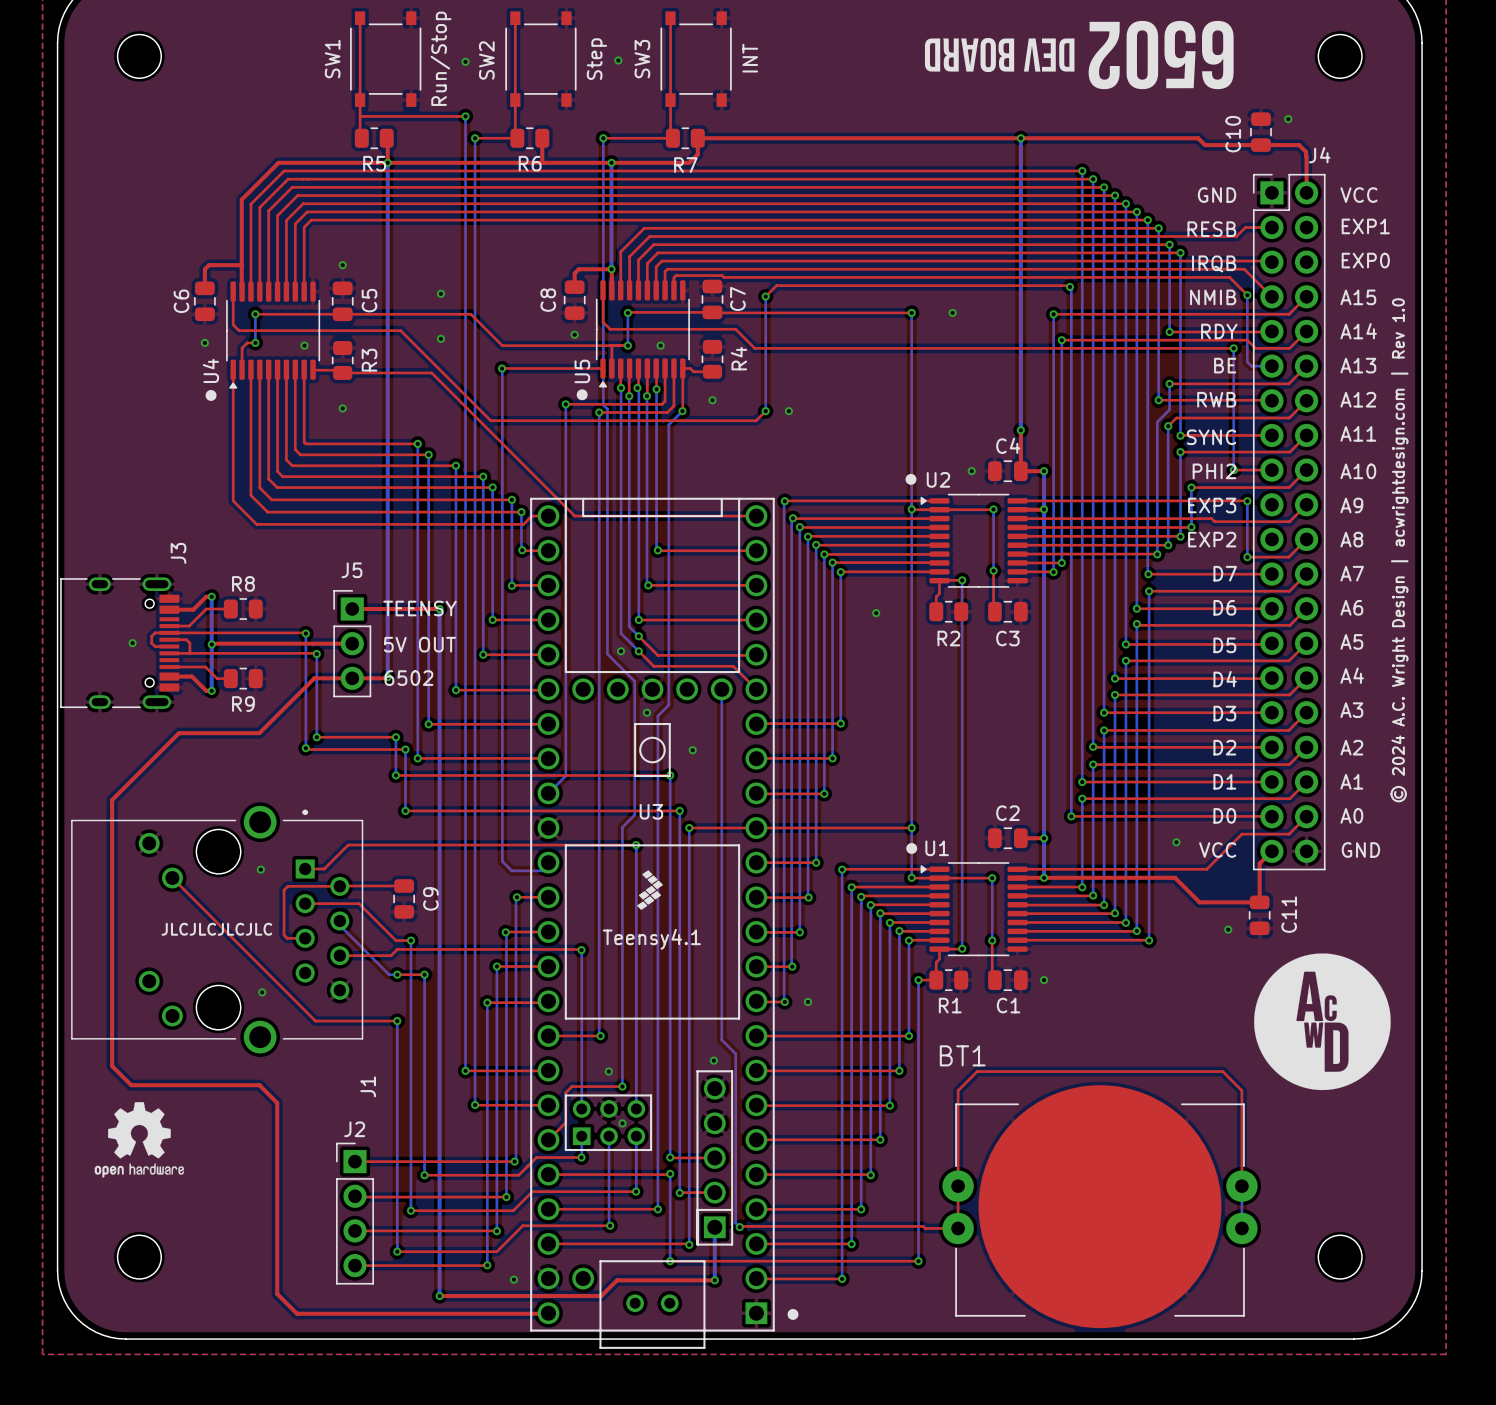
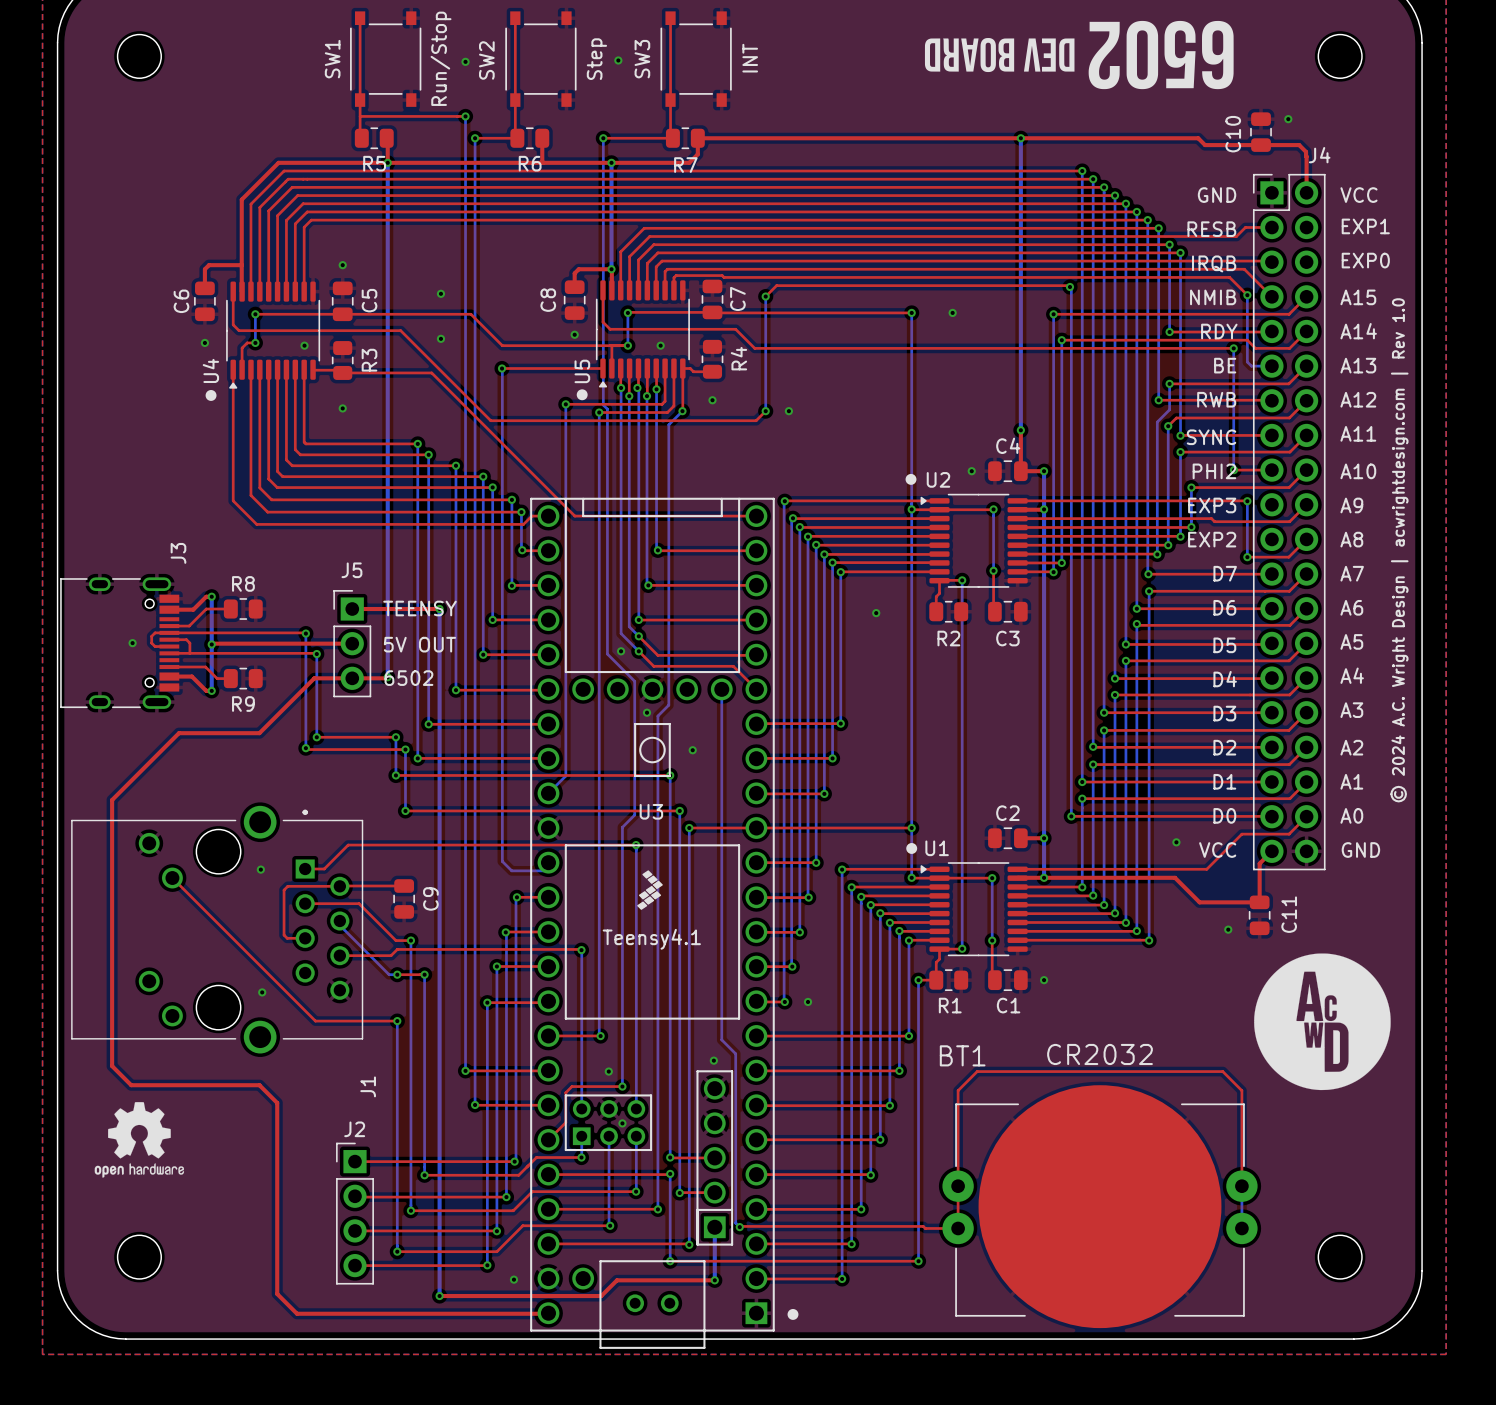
text: JLCJLCJLCJLC (216, 929) -> none
BT1 value: none -> CR2032 (1100, 1054)

